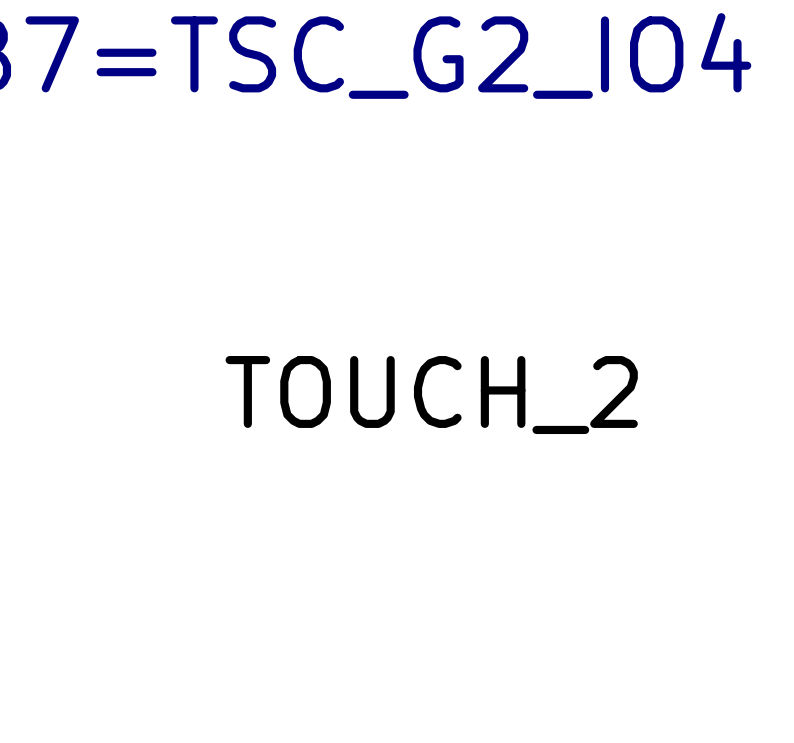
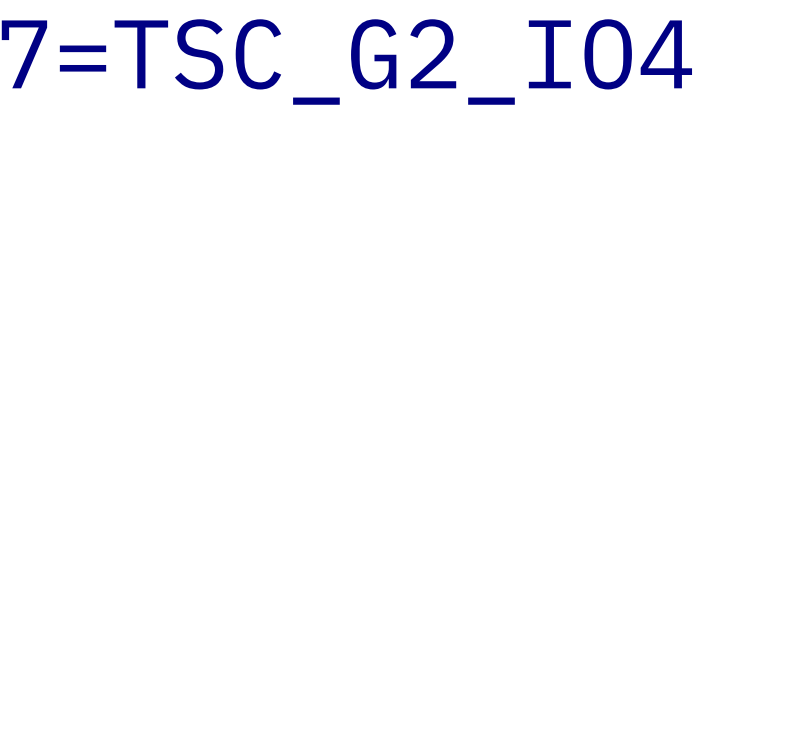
label: TOUCH_2 (431, 395) -> none

